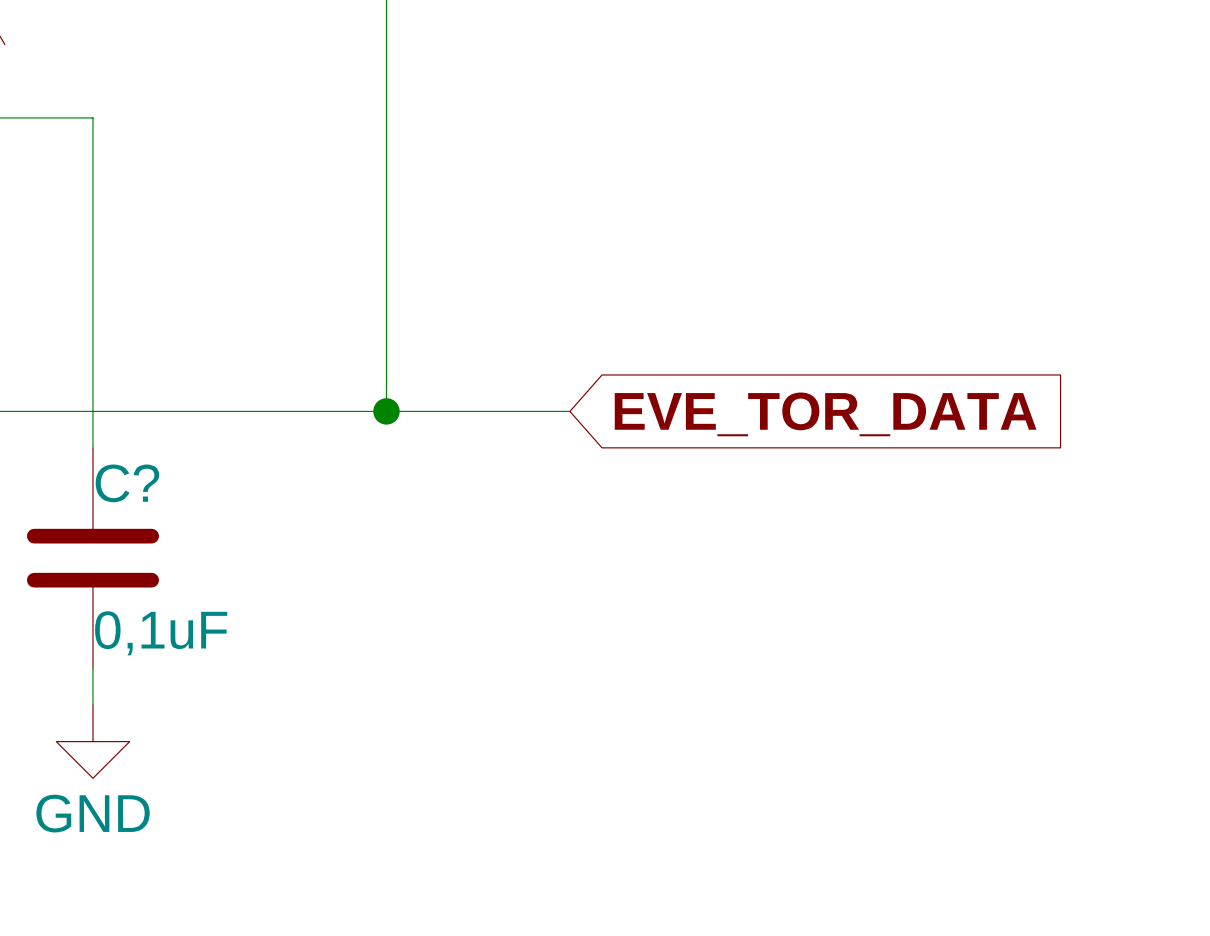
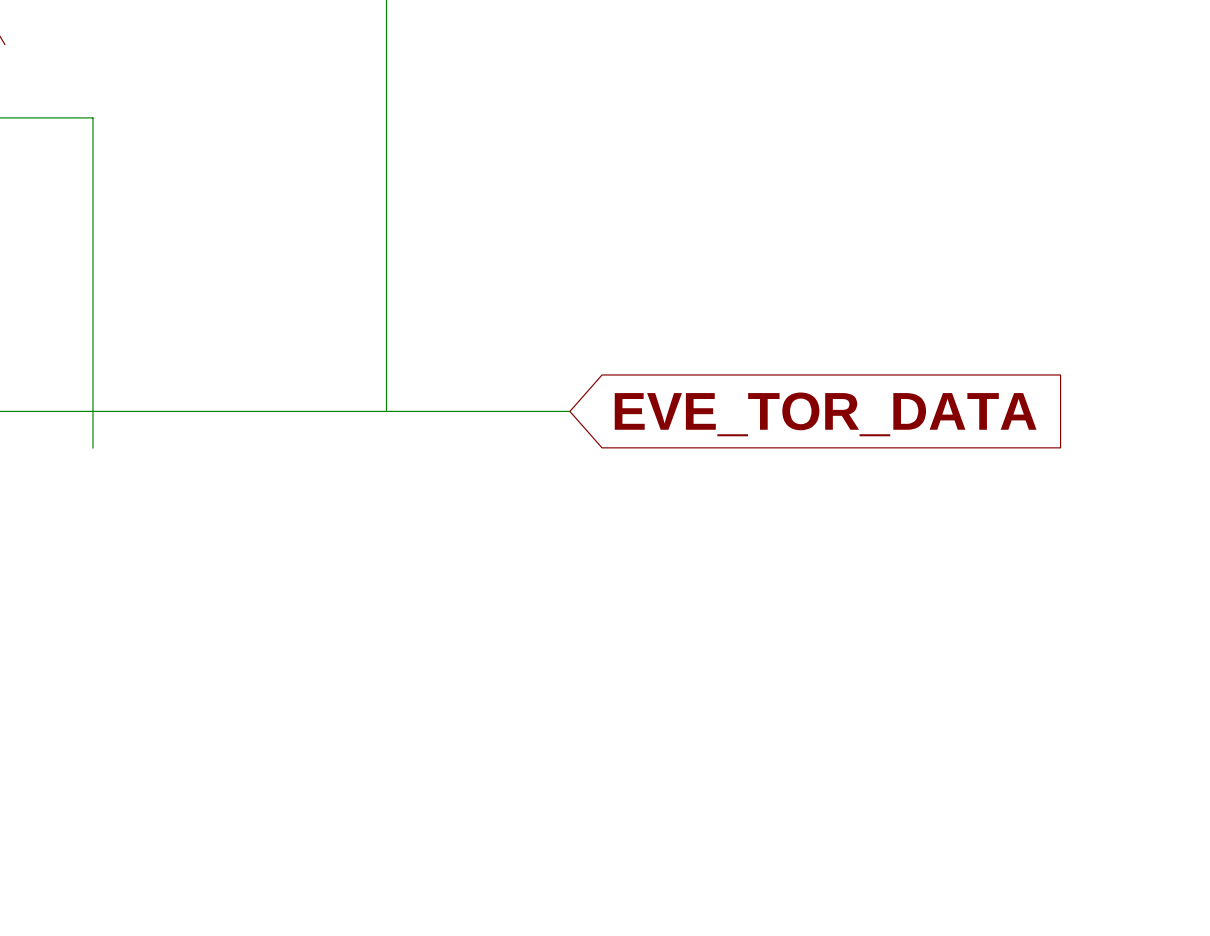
junction: (386, 411) -> none
C?: 0,1uF (92, 558) -> none
wire: (92, 668) (92, 704) -> none
power symbol: GND (92, 741) -> none

